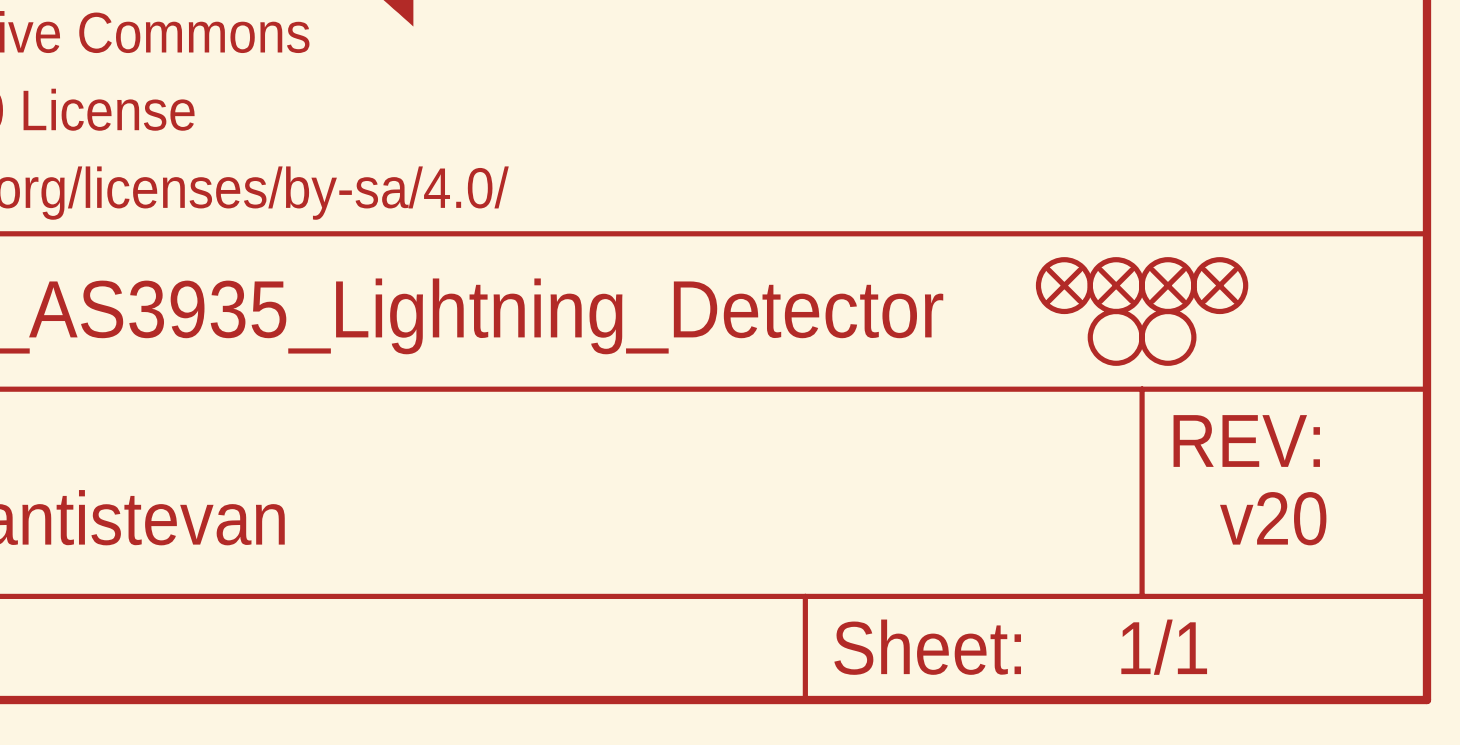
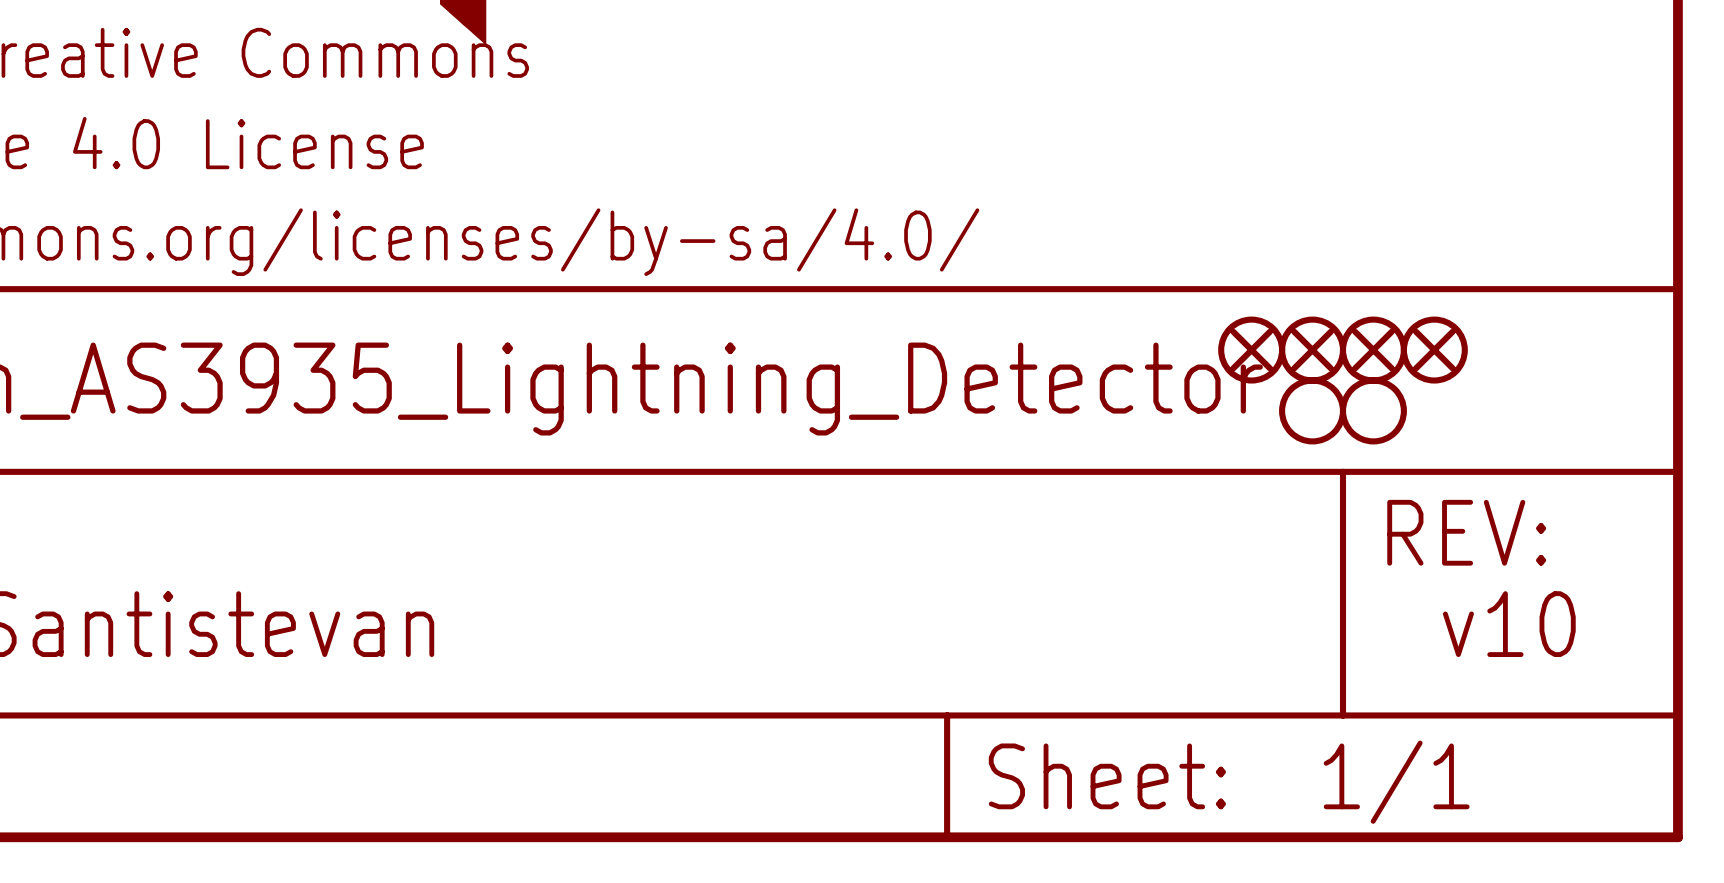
text: v20 (1273, 518) -> v10 (1509, 624)

